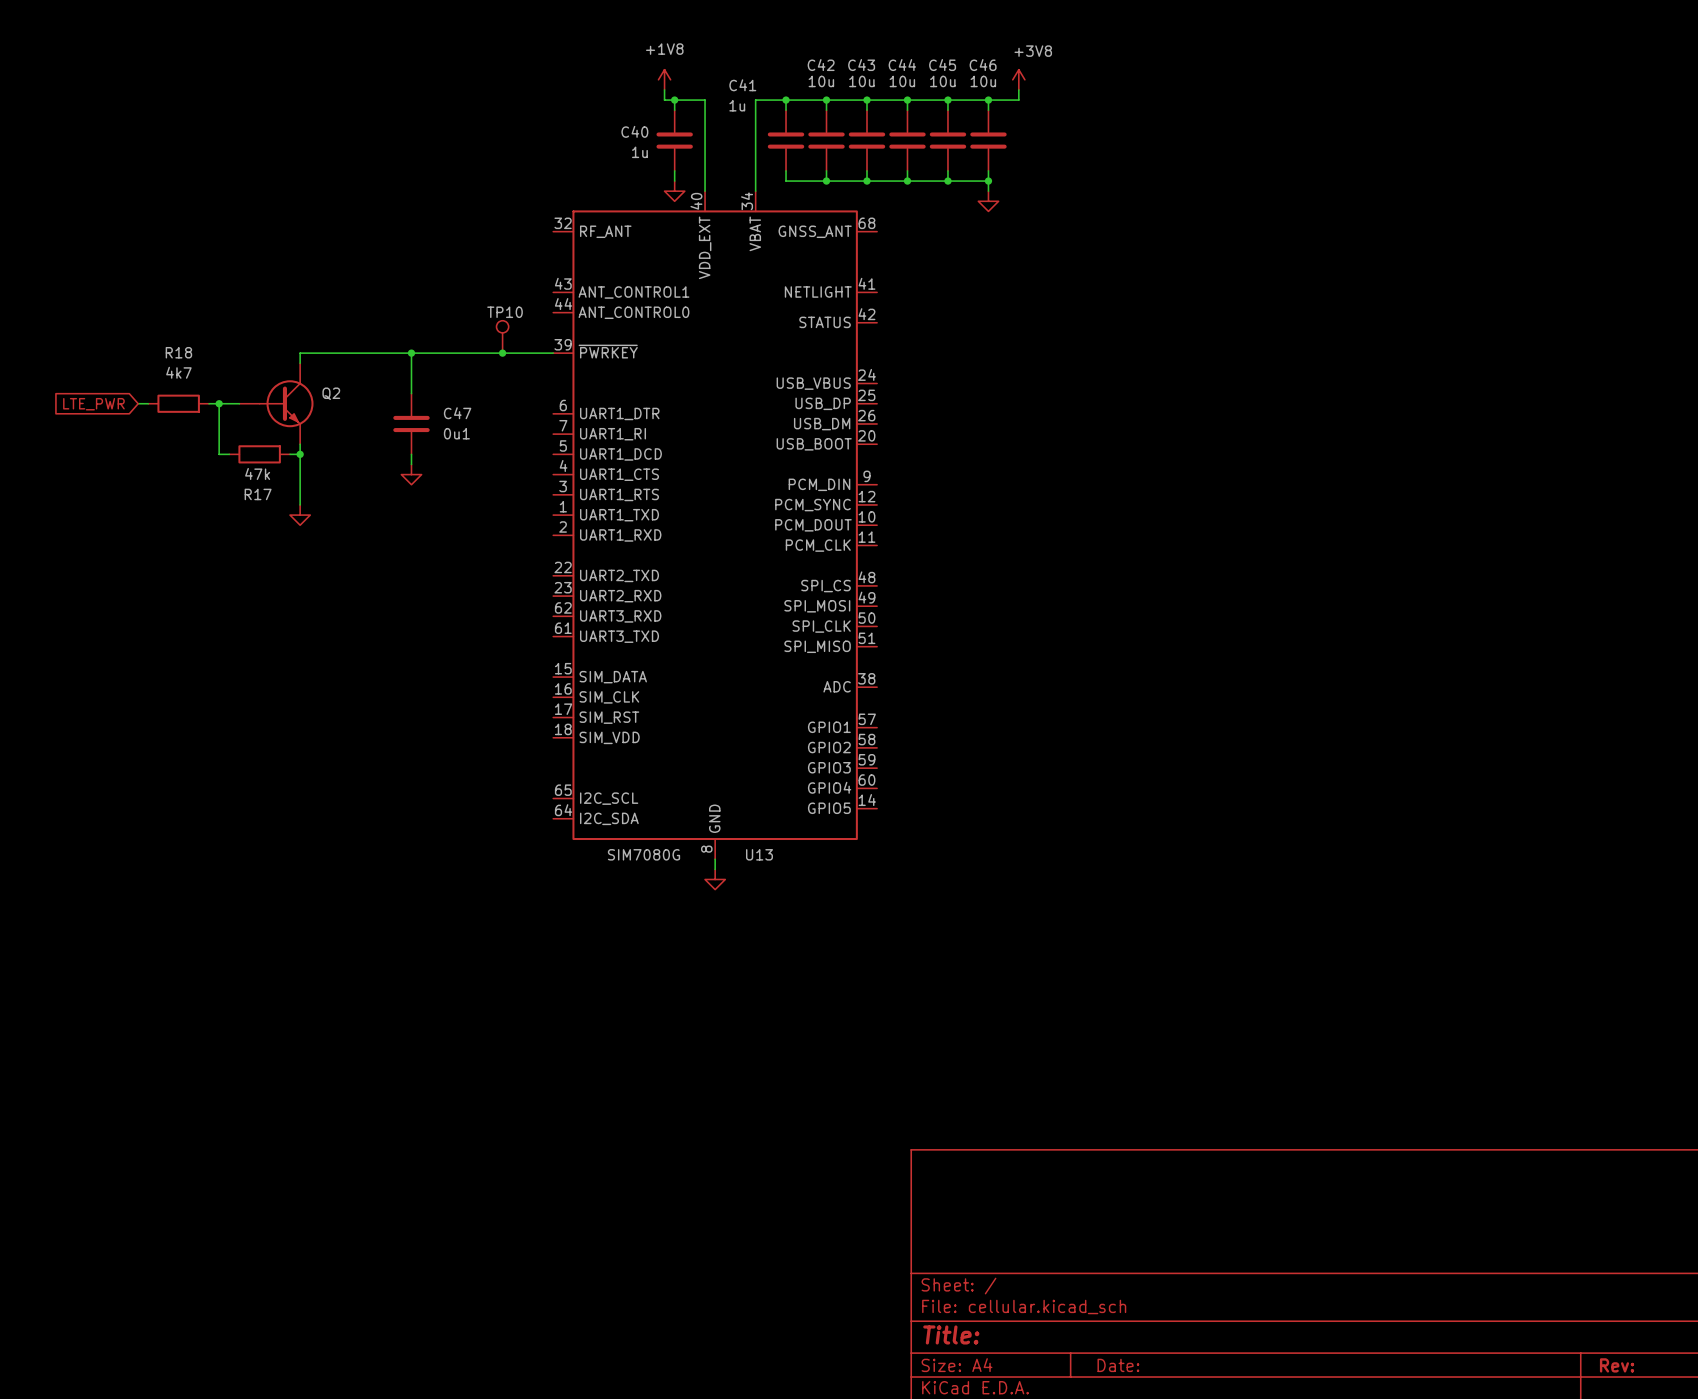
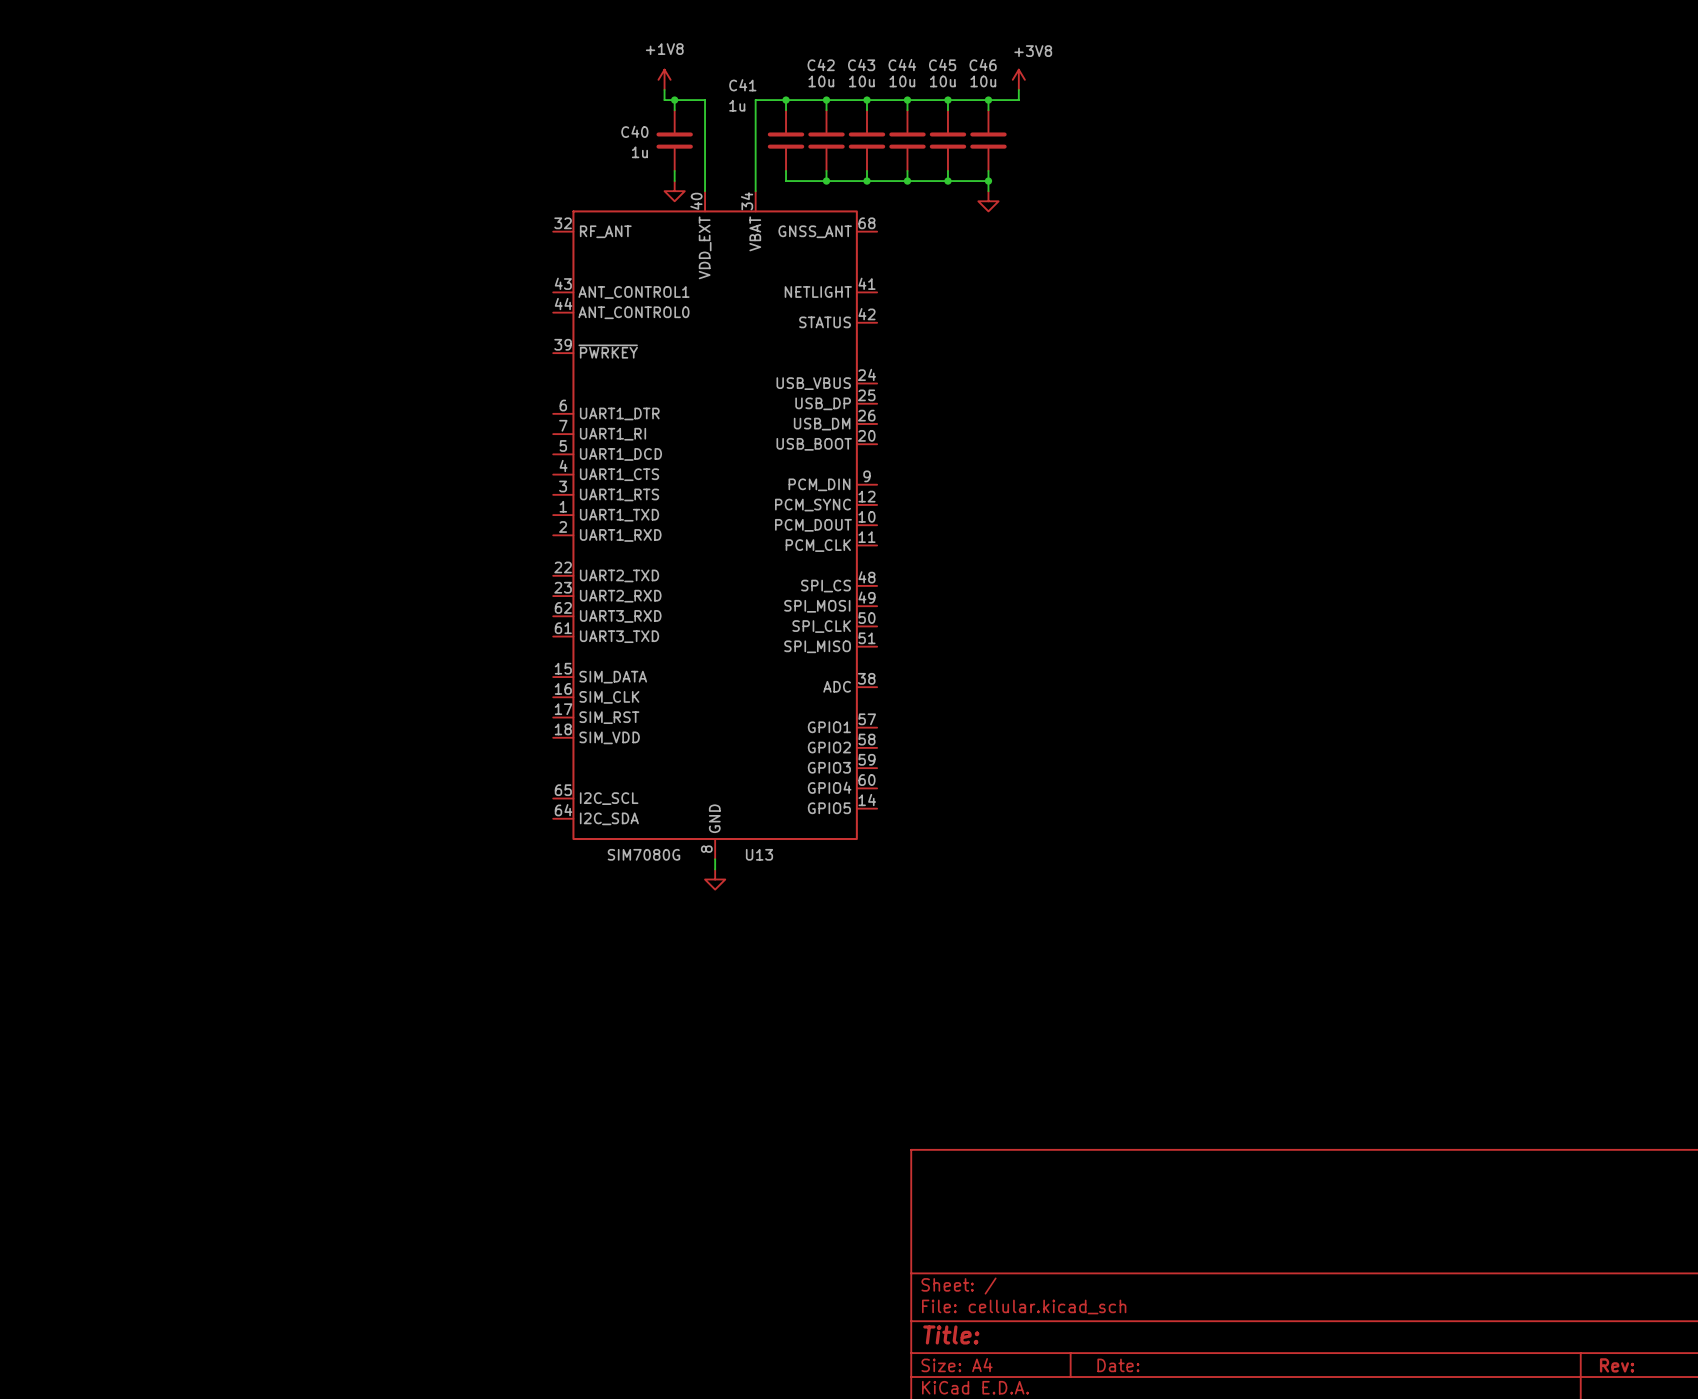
TP10: (502, 336) -> none
wire: (411, 353) (411, 393) -> none
junction: (411, 353) -> none
junction: (502, 353) -> none
wire: (553, 353) (300, 353) (300, 363) -> none
wire: (138, 403) (148, 403) -> none
R18: 4k7 (178, 403) -> none
wire: (209, 403) (239, 403) -> none
wire: (219, 403) (219, 454) (229, 454) -> none
junction: (219, 403) -> none
Q2: (276, 403) -> none
global label: LTE_PWR (93, 404) -> none
C47: 0u1 (411, 423) -> none
wire: (300, 444) (300, 504) -> none
R17: 47k (259, 454) -> none
wire: (290, 454) (300, 454) -> none
junction: (300, 454) -> none
wire: (411, 454) (411, 464) -> none
power symbol: (411, 474) -> none
power symbol: (300, 515) -> none

